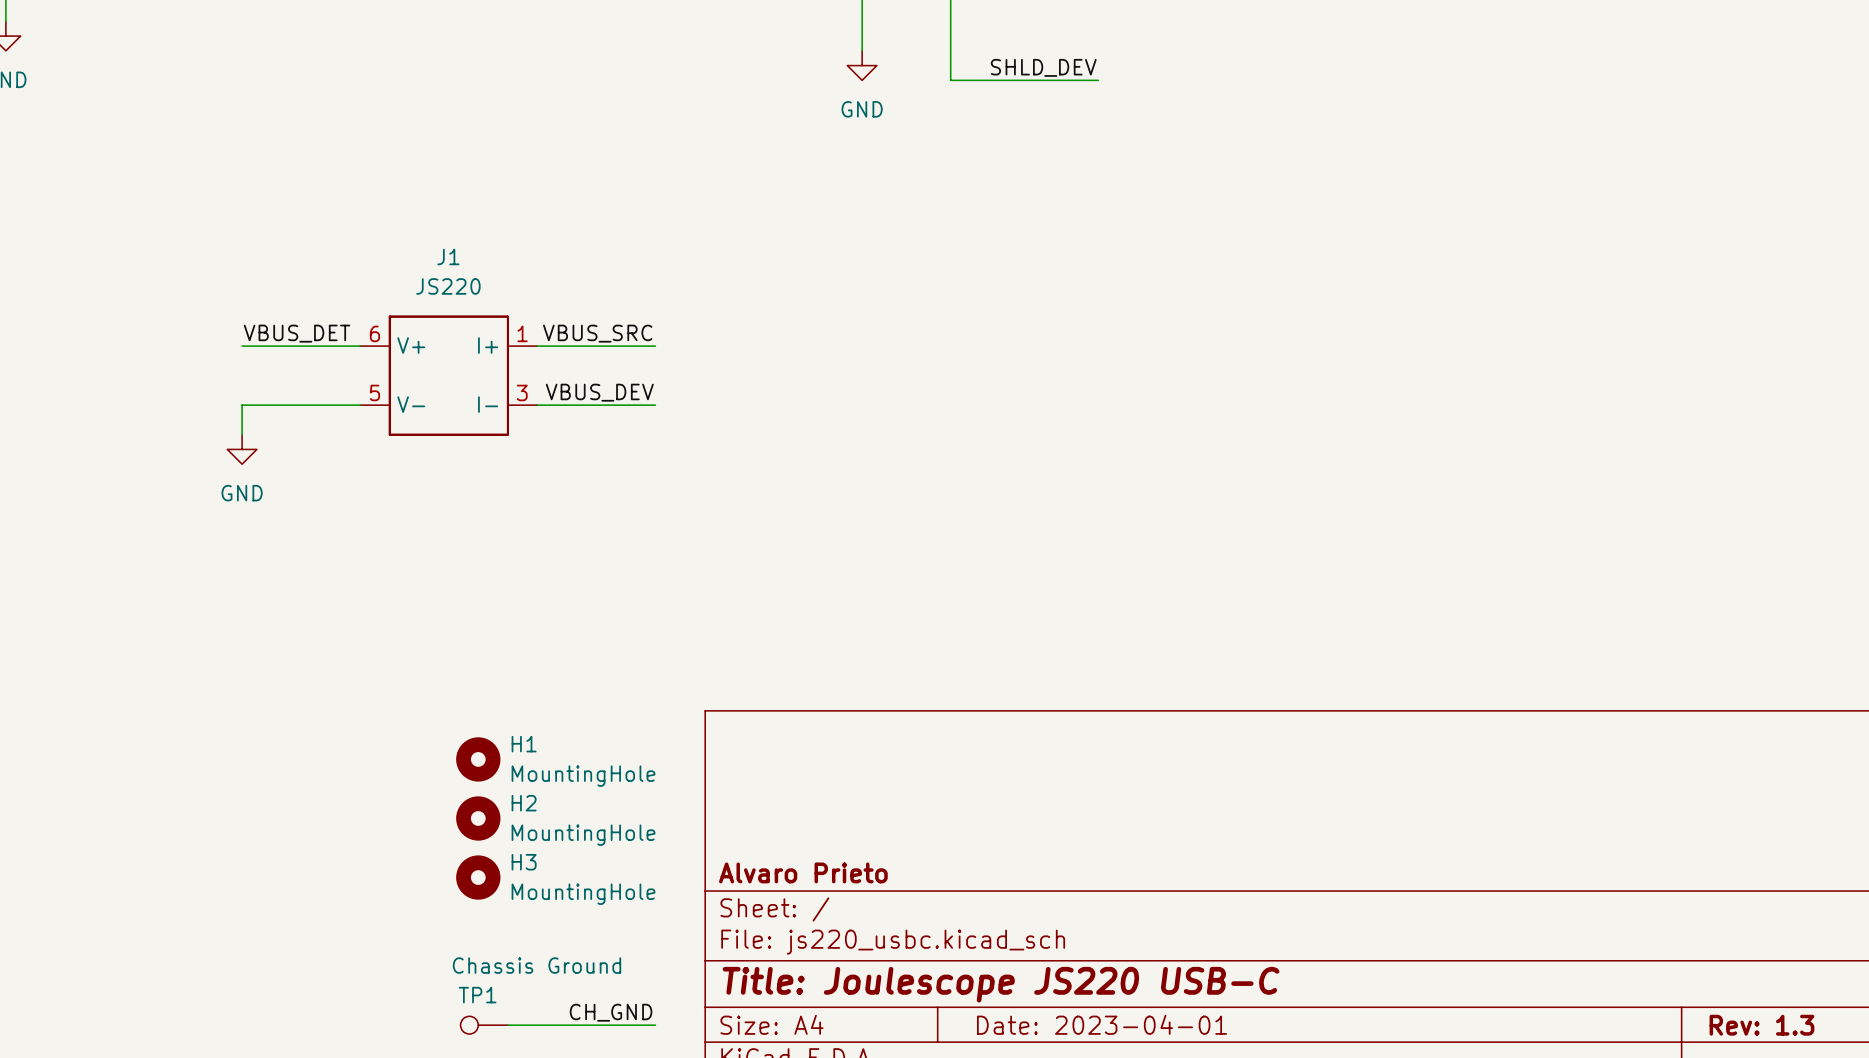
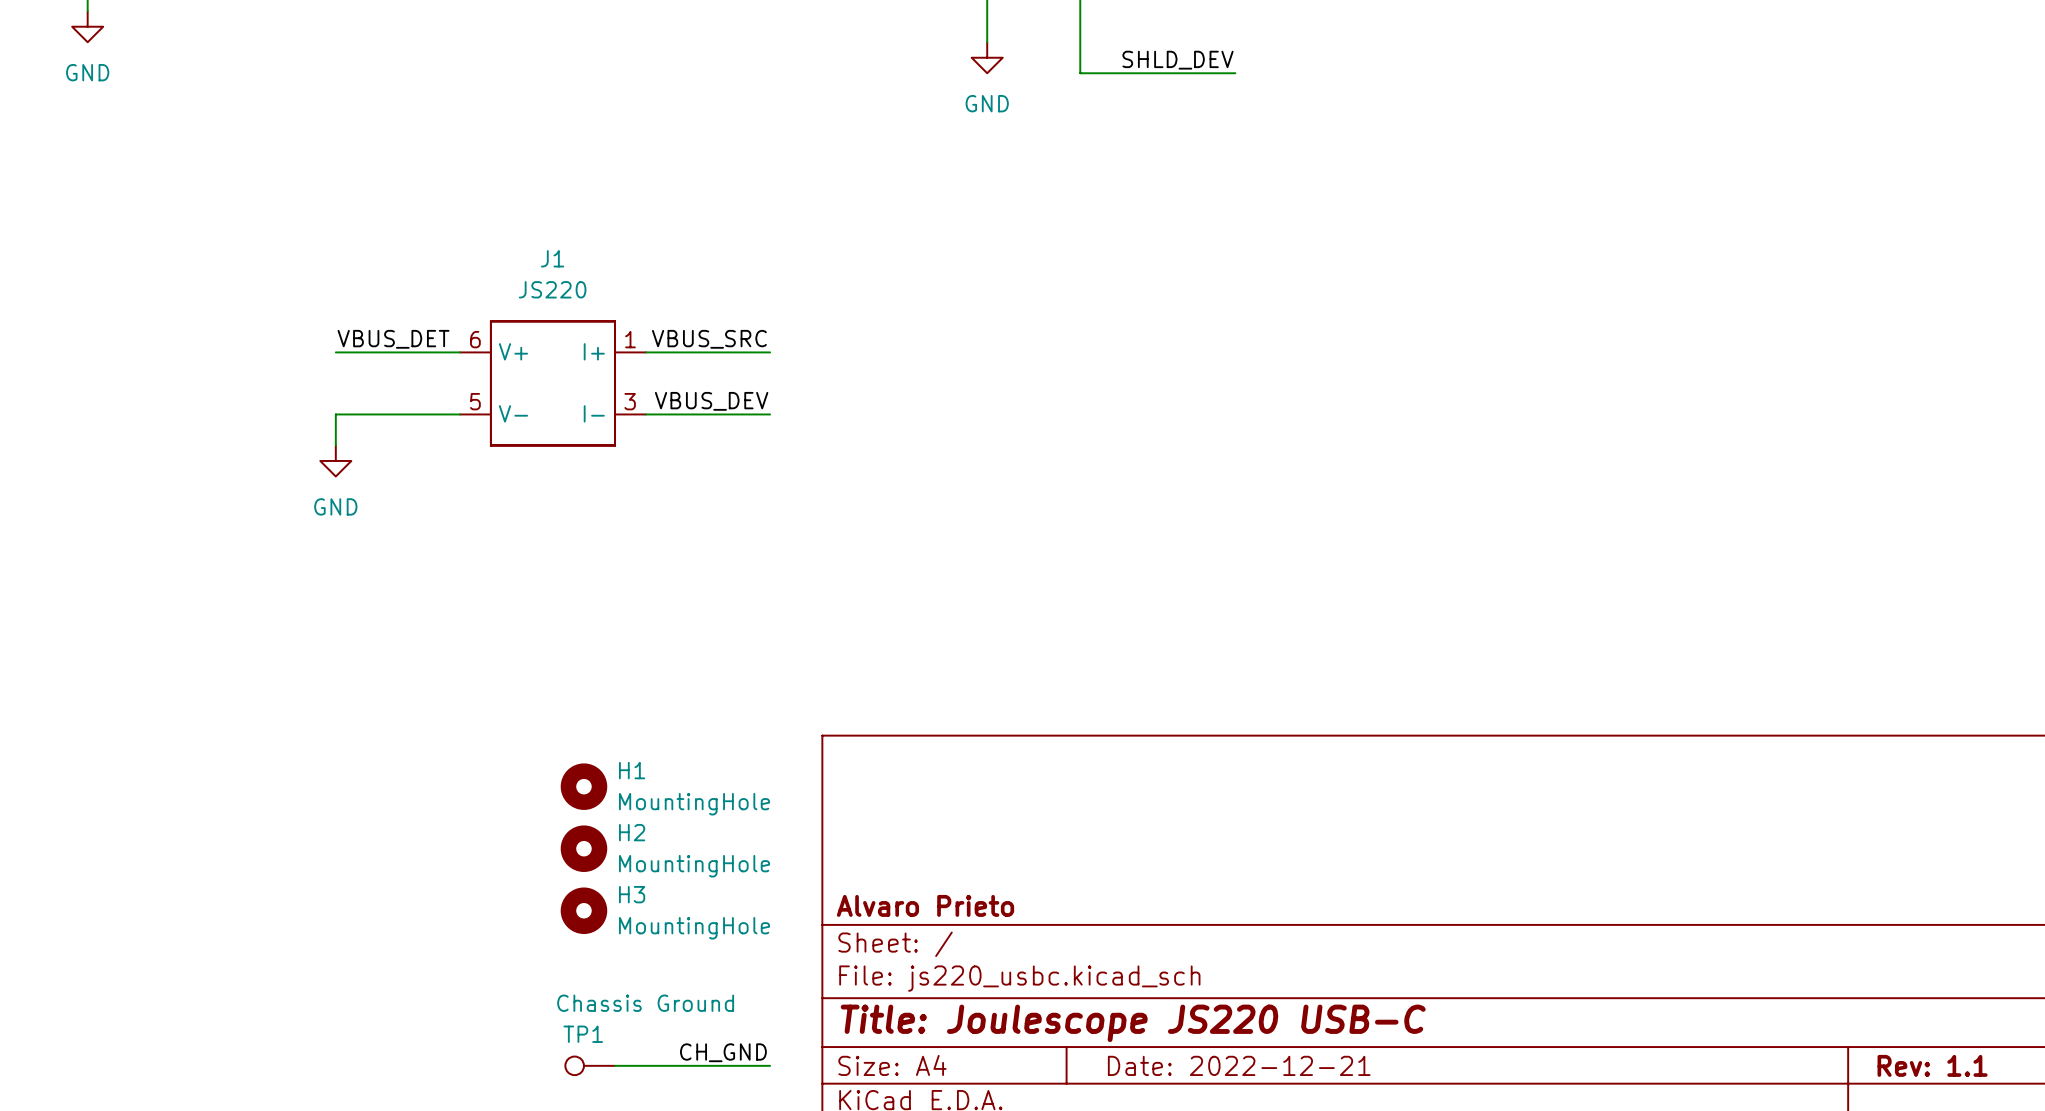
title block: Date: 2023-04-01 (1102, 1024) -> Date: 2022-12-21 (1239, 1065)
title block: Rev: 1.3 (1761, 1025) -> Rev: 1.1 (1932, 1065)

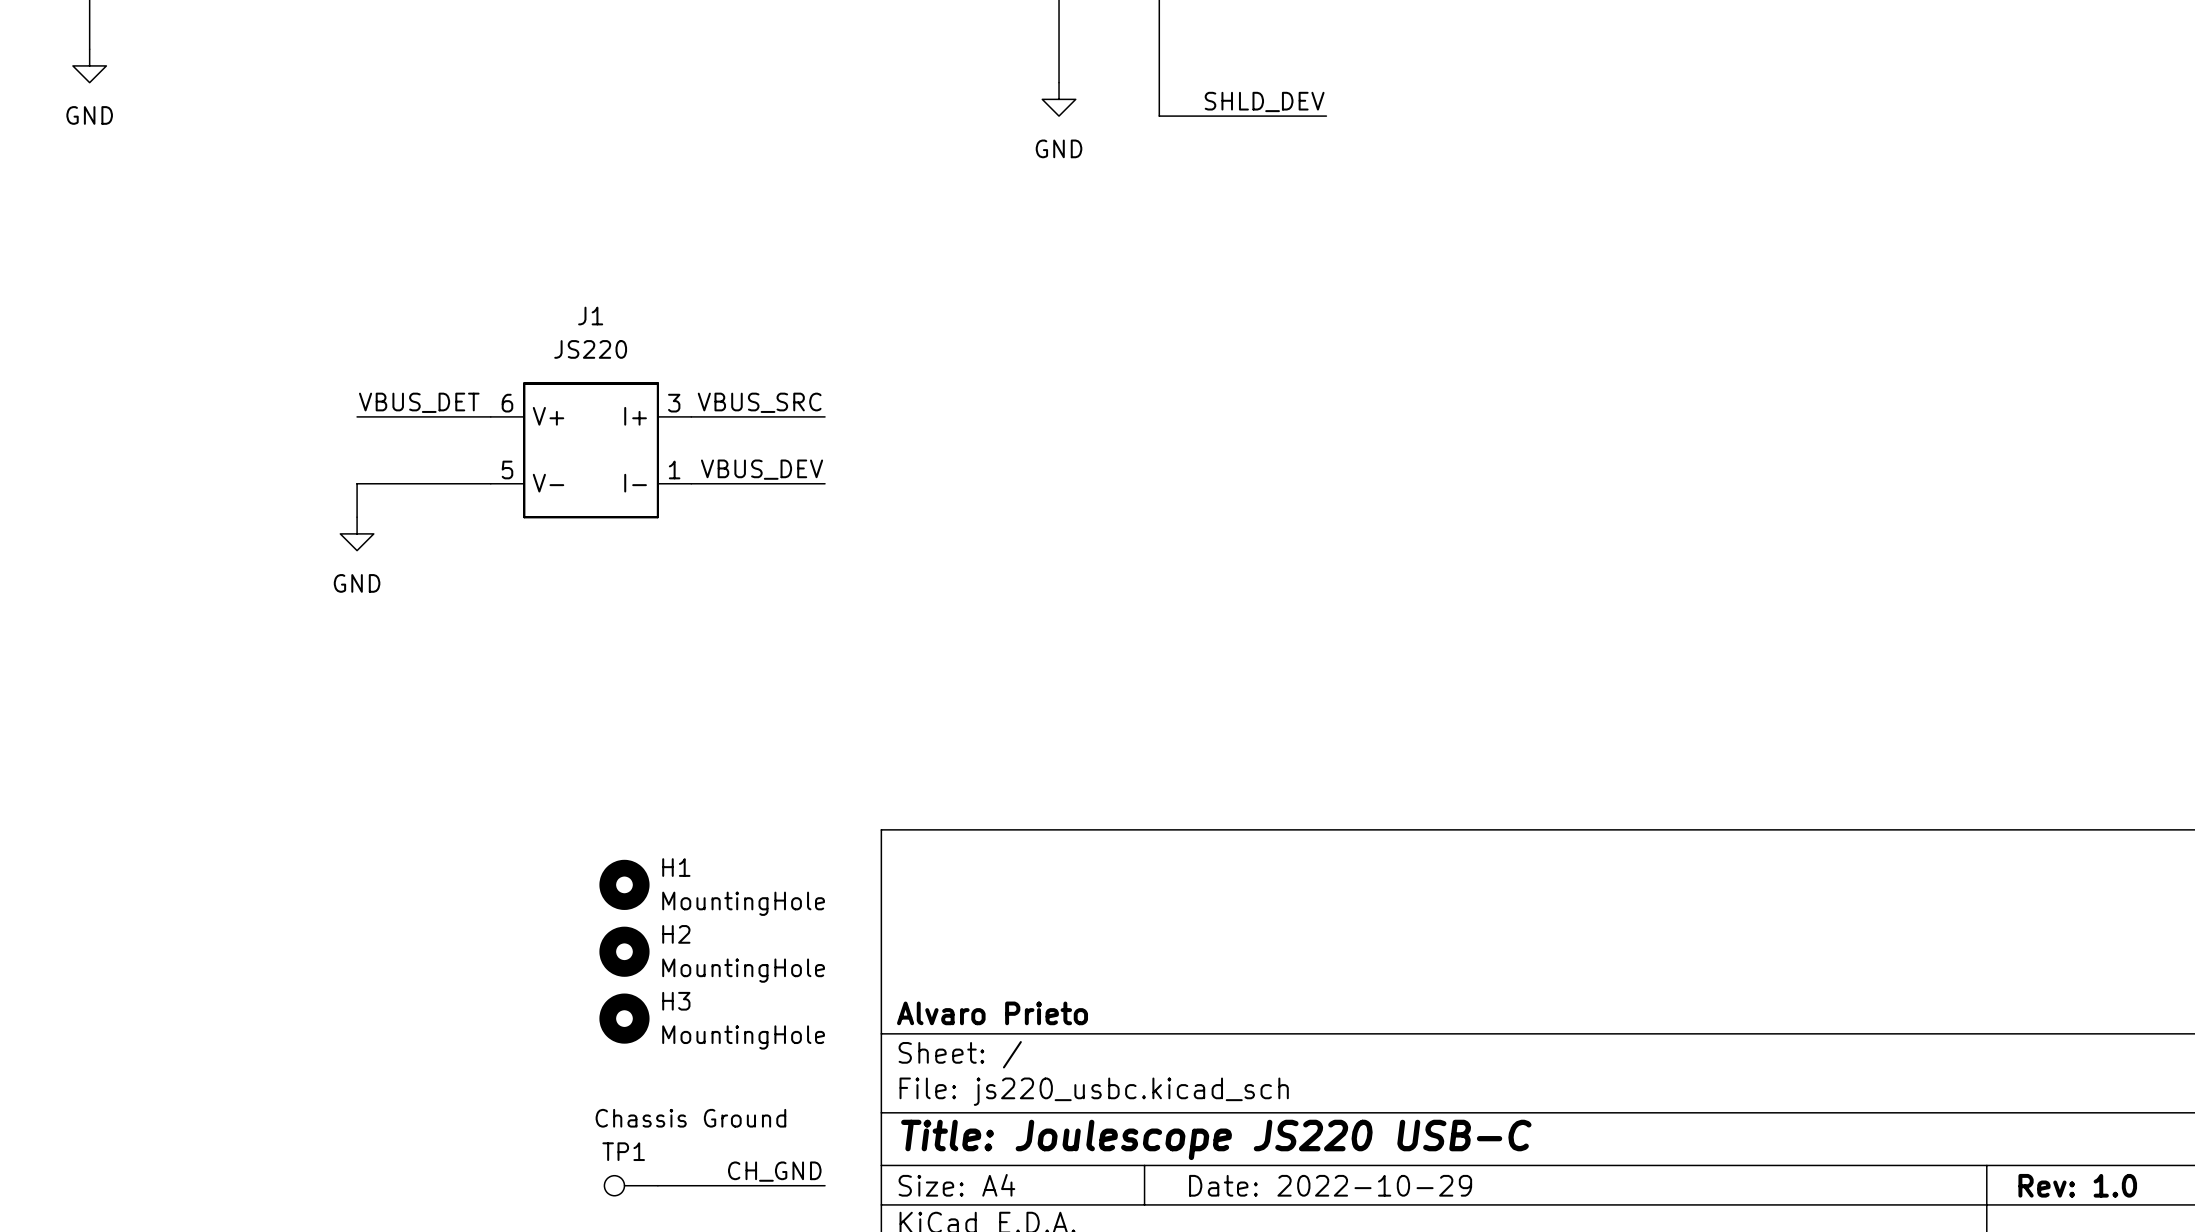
J1 pin number: 1 (630, 339) -> 3 (674, 403)
J1 pin number: 3 (630, 401) -> 1 (674, 469)
title block: Date: 2022-12-21 (1239, 1065) -> Date: 2022-10-29 (1330, 1185)
title block: Rev: 1.1 (1932, 1065) -> Rev: 1.0 (2077, 1185)

